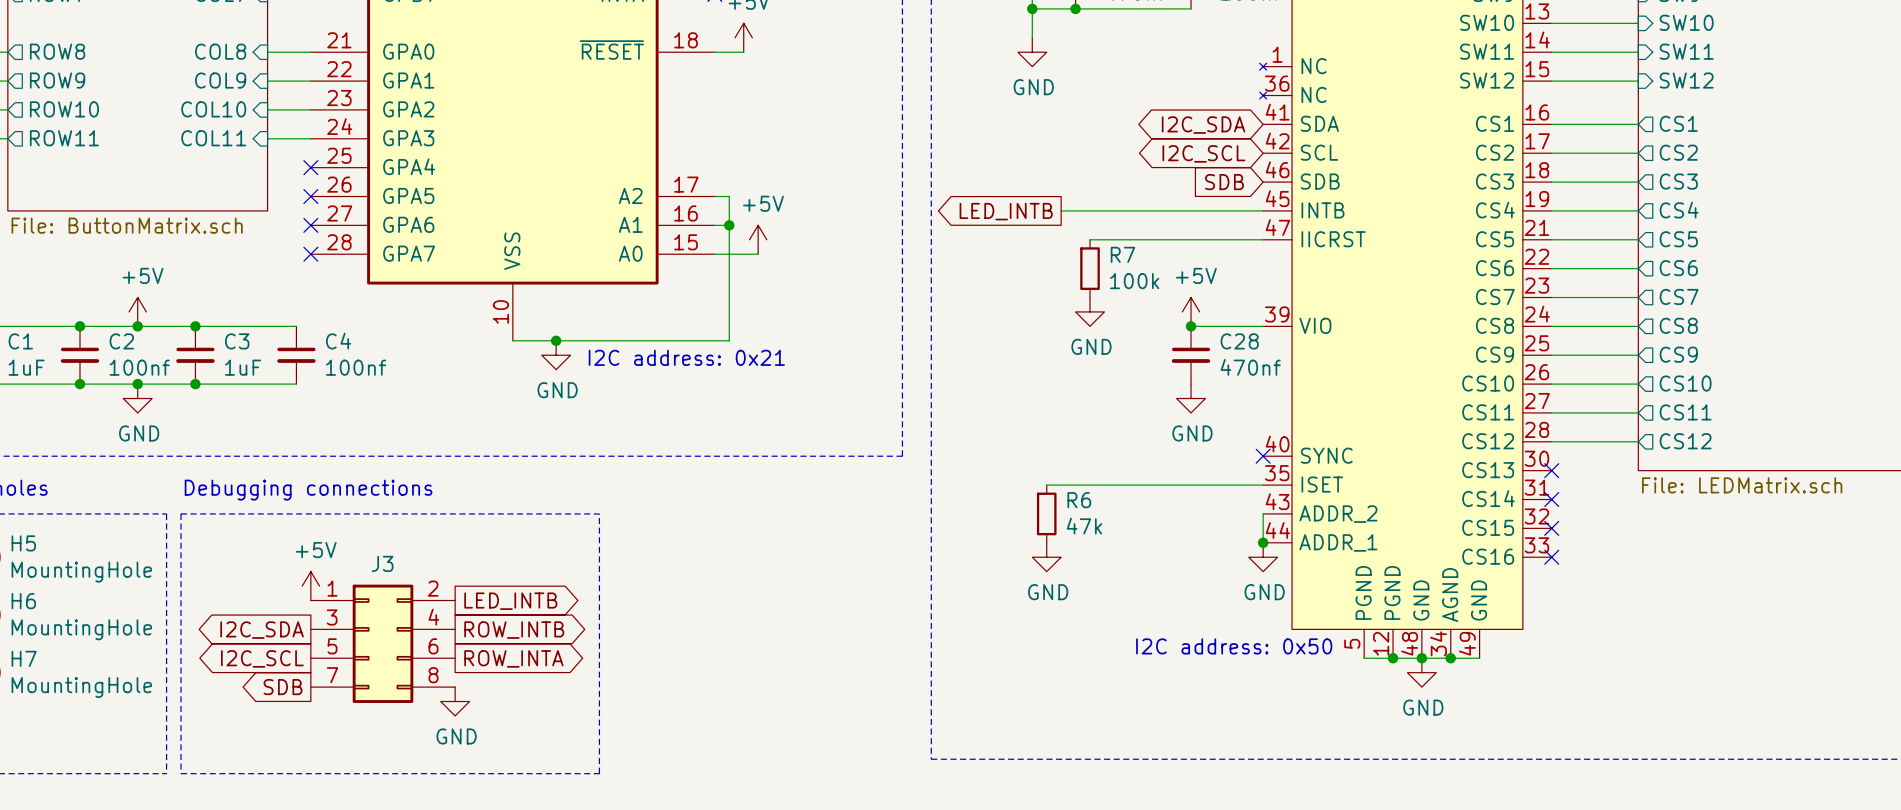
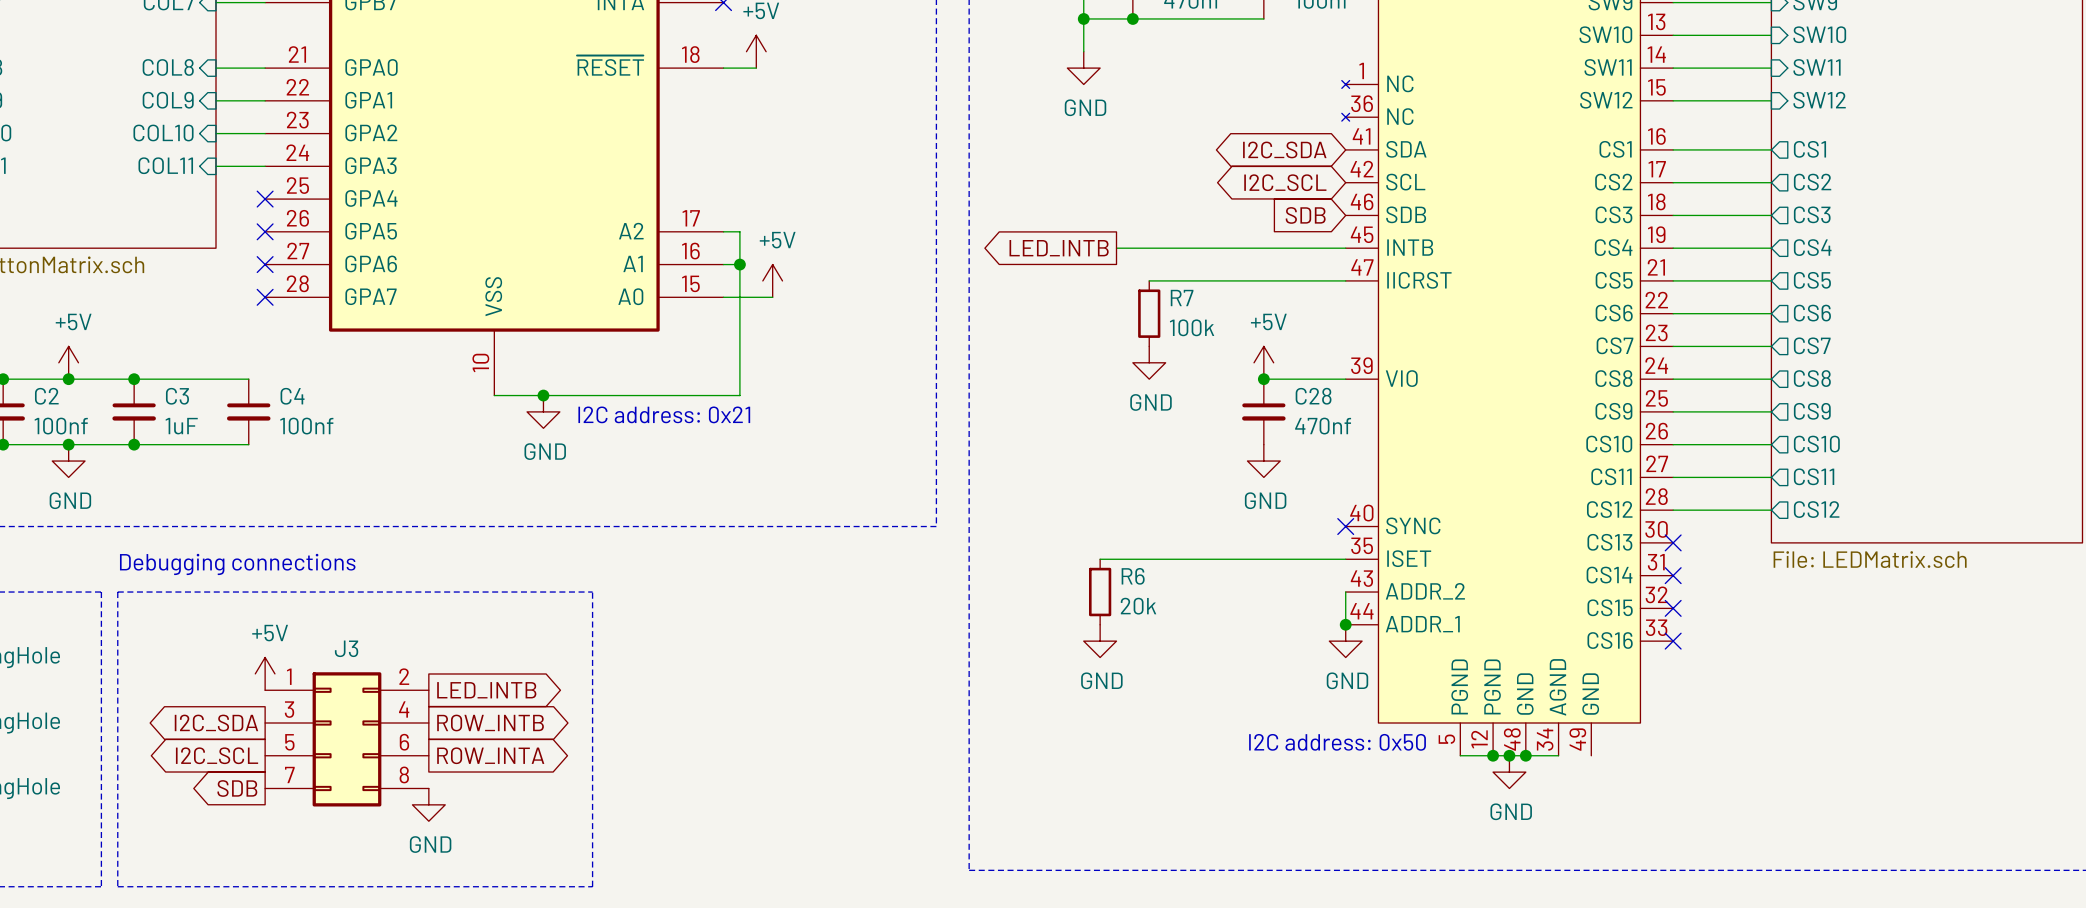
R6 value: 47k (1084, 526) -> 20k (1138, 606)
wire: (1450, 658) (1479, 658) -> none
junction position: (1450, 658) -> (1509, 755)
power symbol position: GND (1421, 672) -> GND (1509, 772)

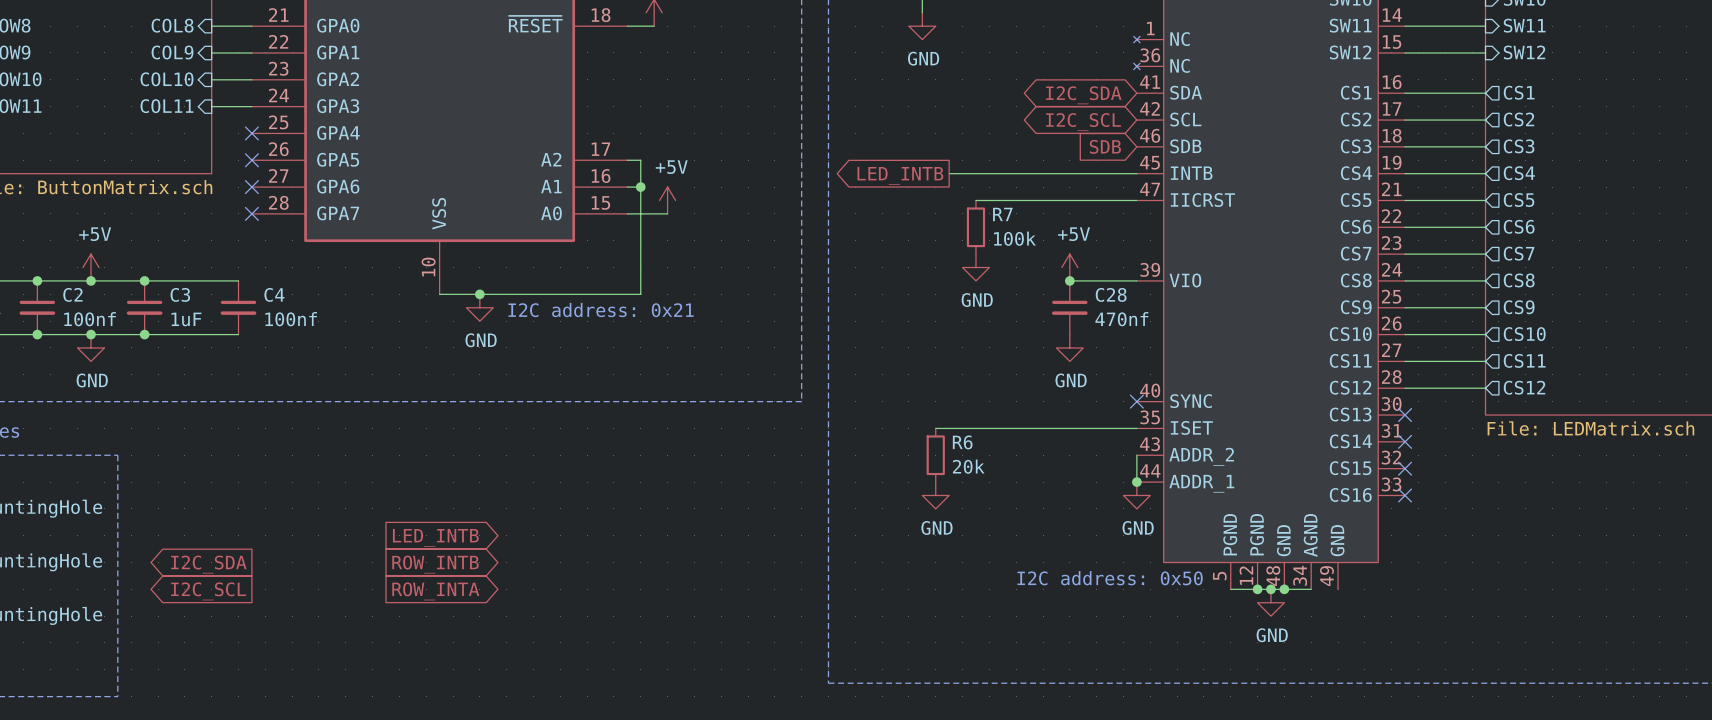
text: Debugging connections (237, 564) -> none
line: (117, 592) (117, 886) (592, 886) (592, 592) (117, 592) -> none
power symbol: +5V (265, 673) -> none
J3: (346, 739) -> none
global label: SDB (237, 788) -> none
power symbol: GND (428, 804) -> none

